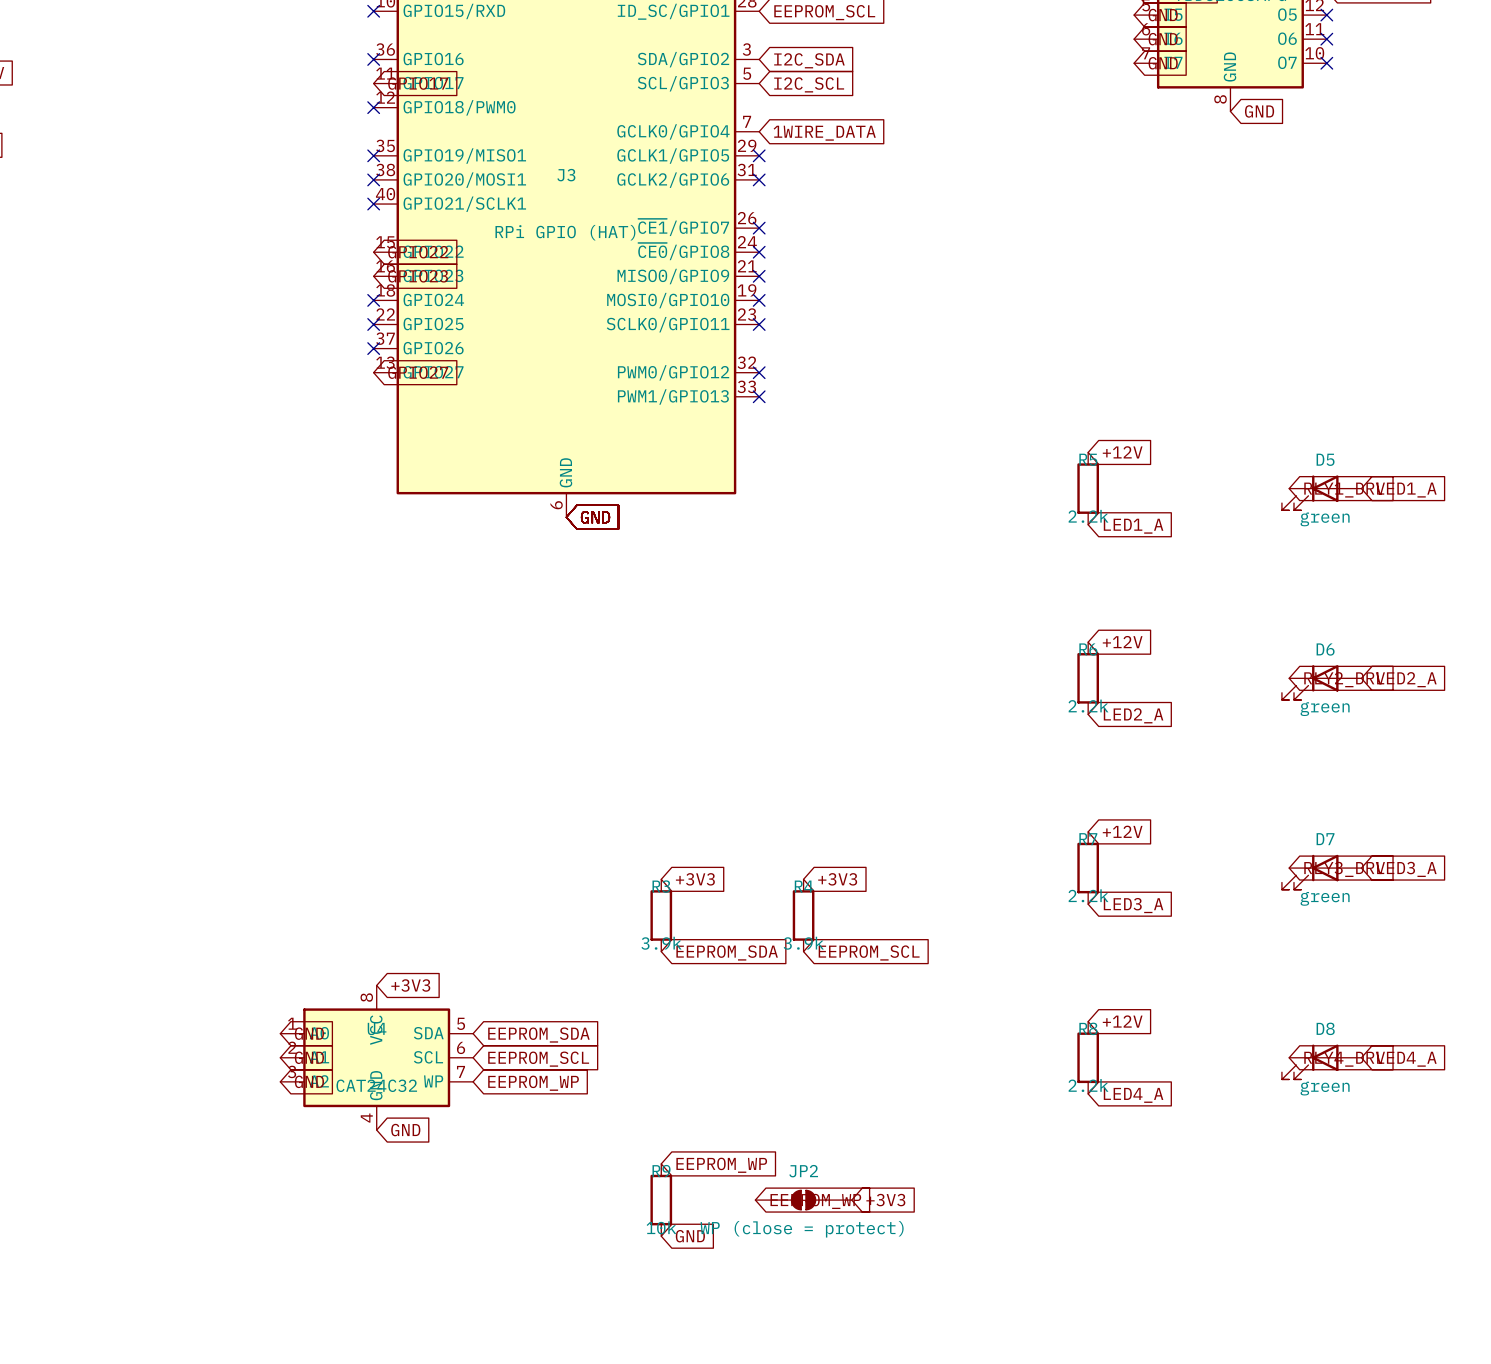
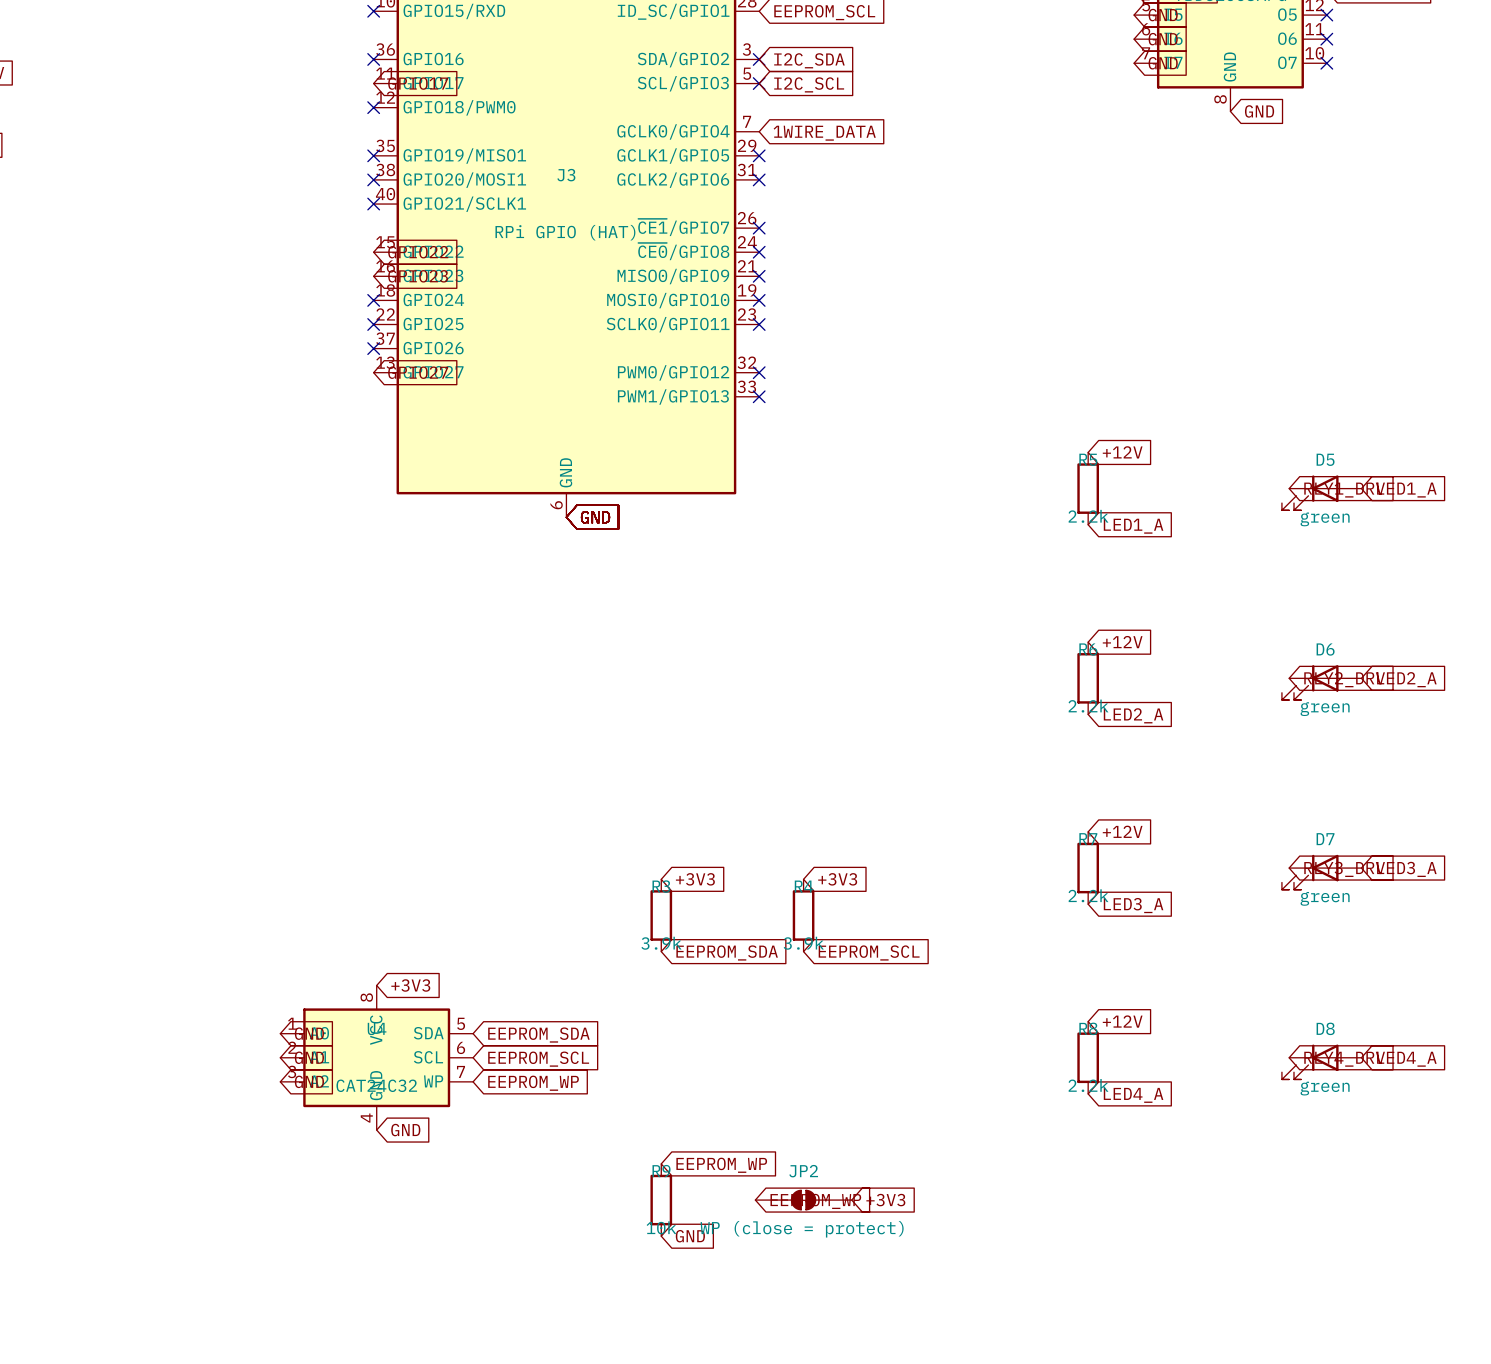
no-connect mark: none -> (759, 59)
no-connect mark: none -> (759, 83)

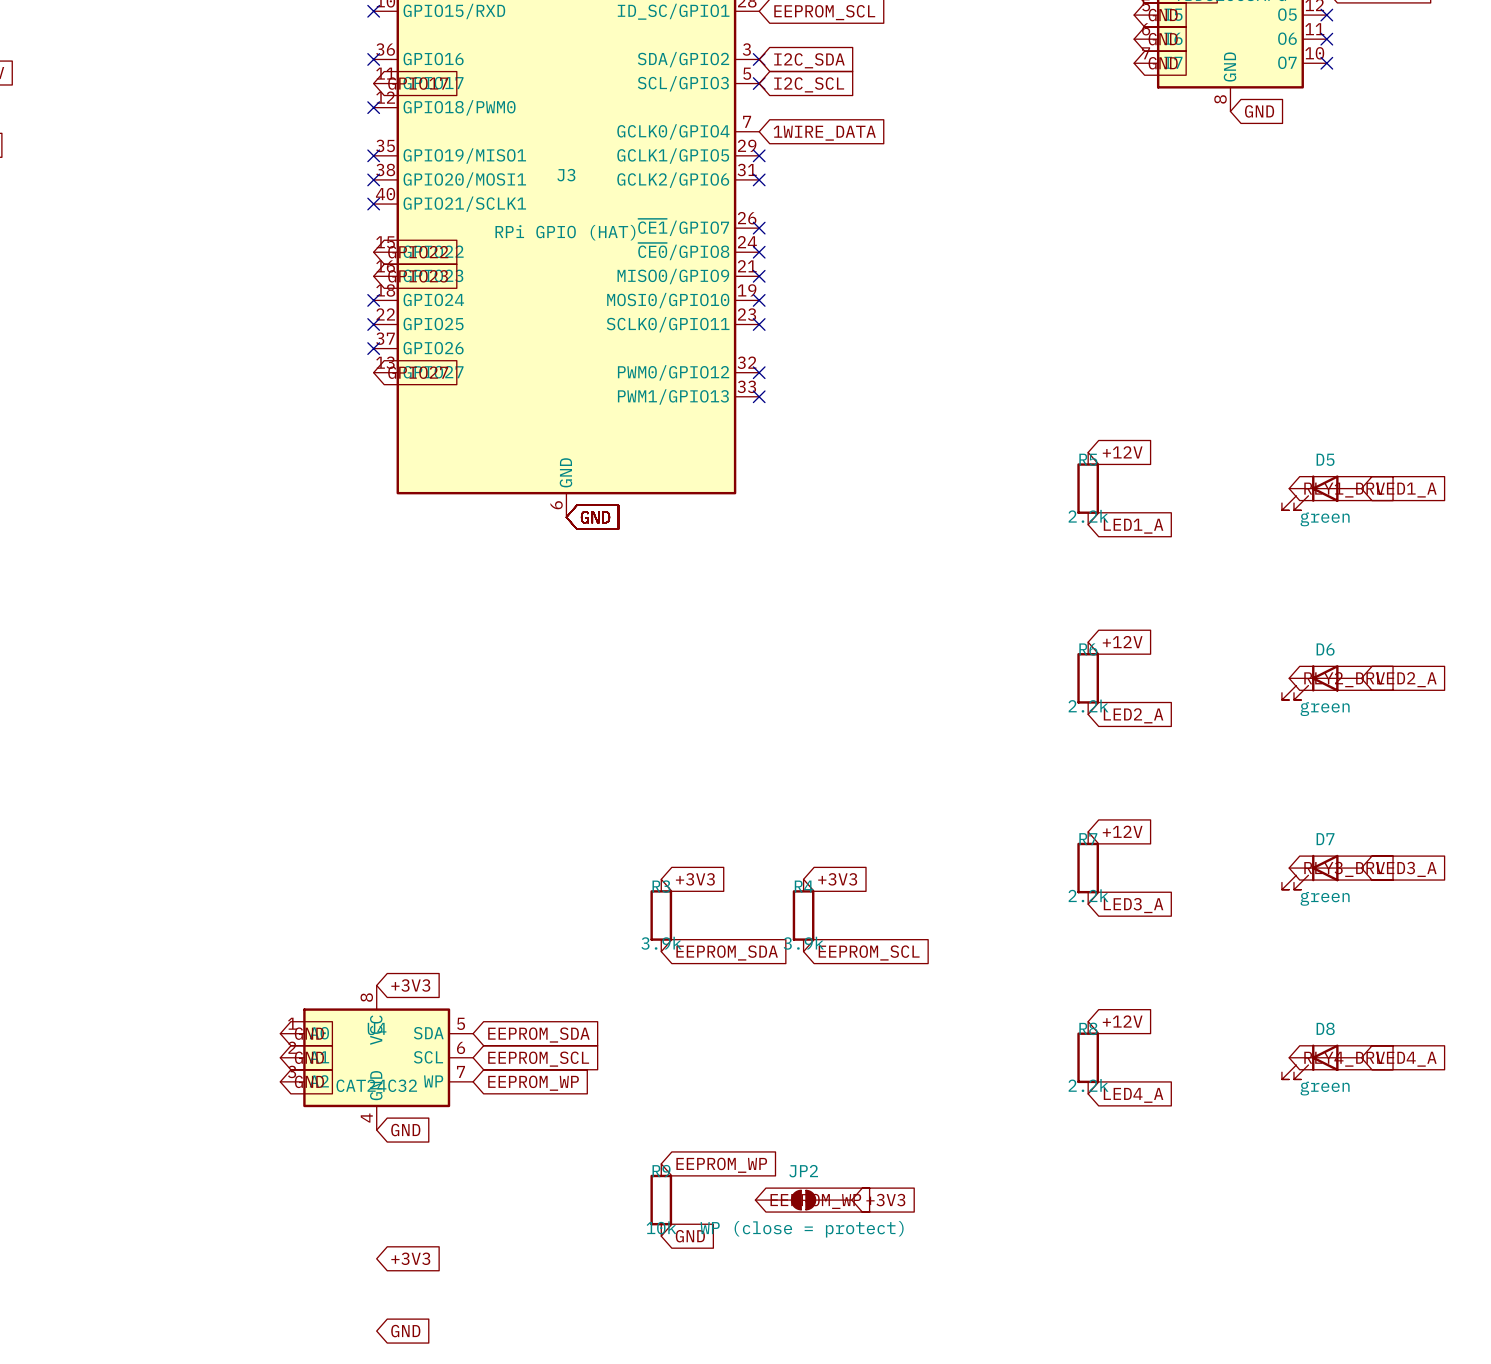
global label: none -> +3V3 (410, 1258)
global label: none -> GND (405, 1331)

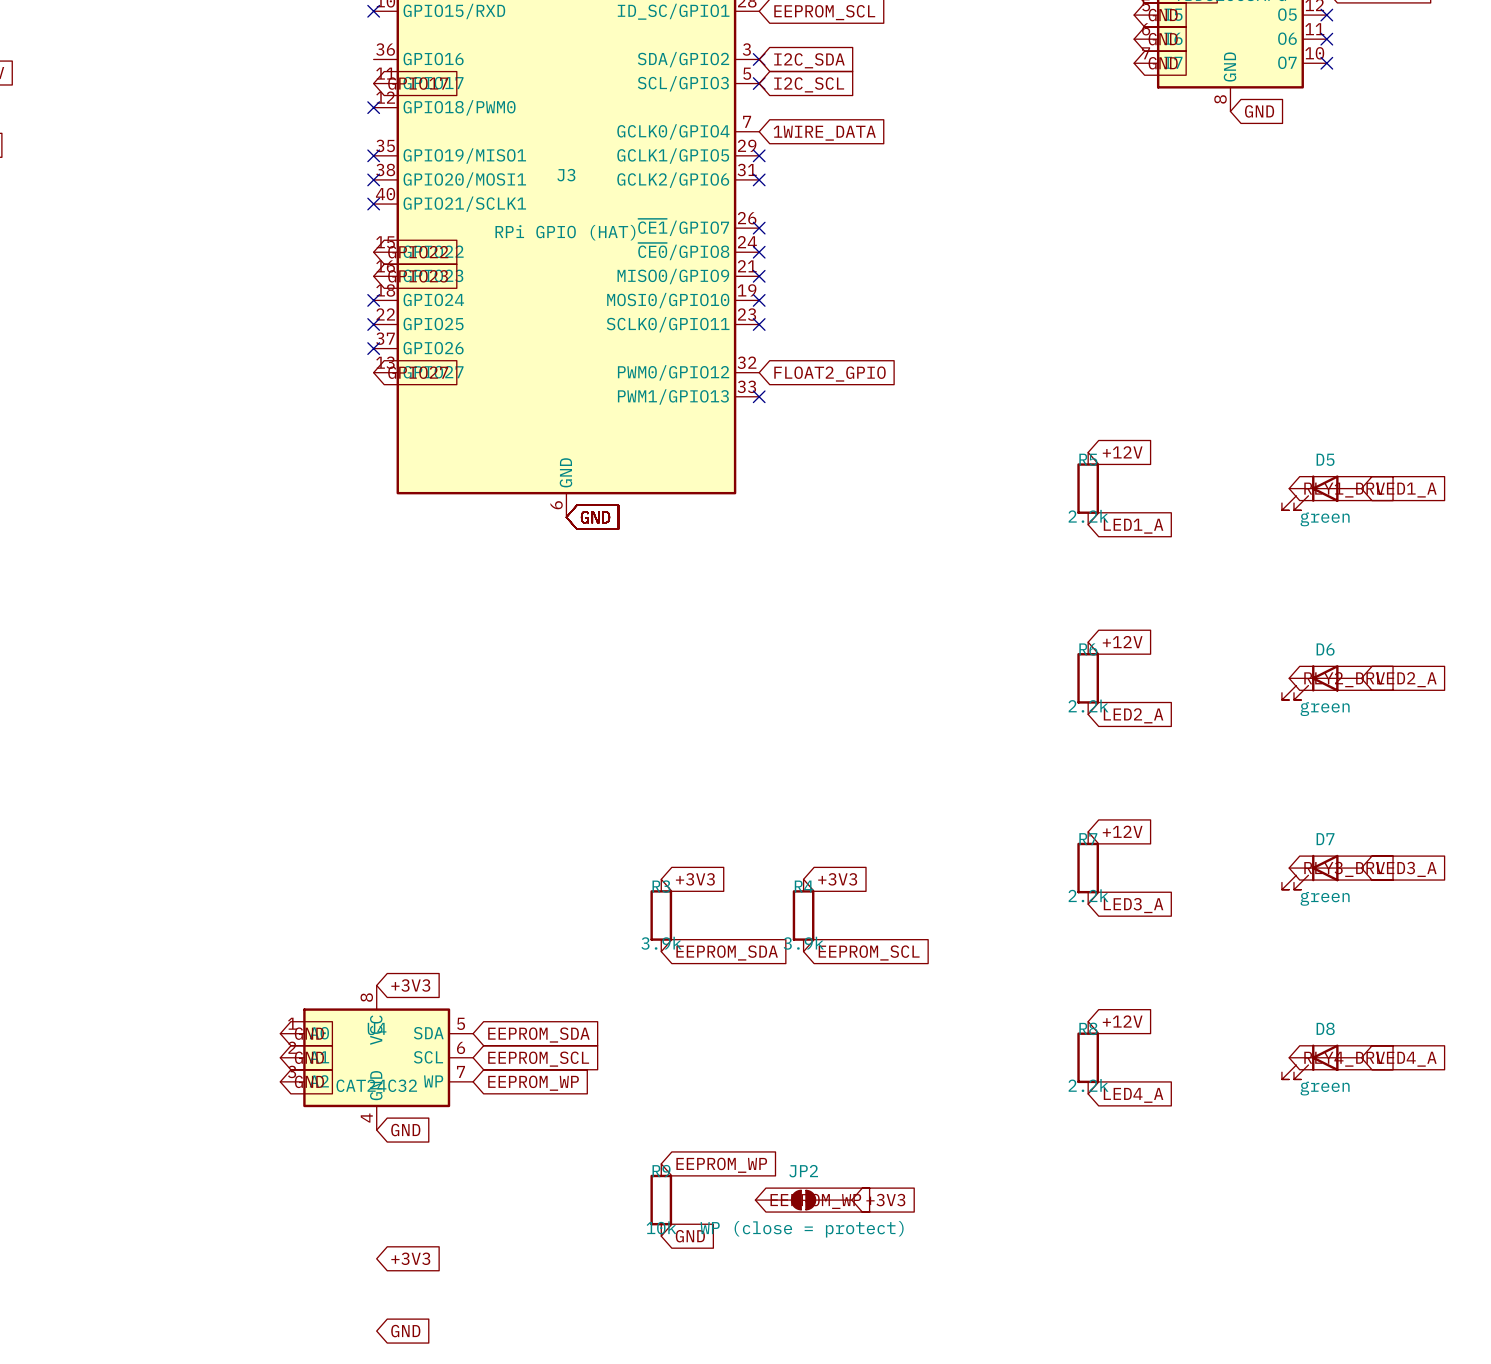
no-connect mark: (373, 59) -> none
no-connect mark: (759, 372) -> none
global label: none -> FLOAT2_GPIO (829, 374)

